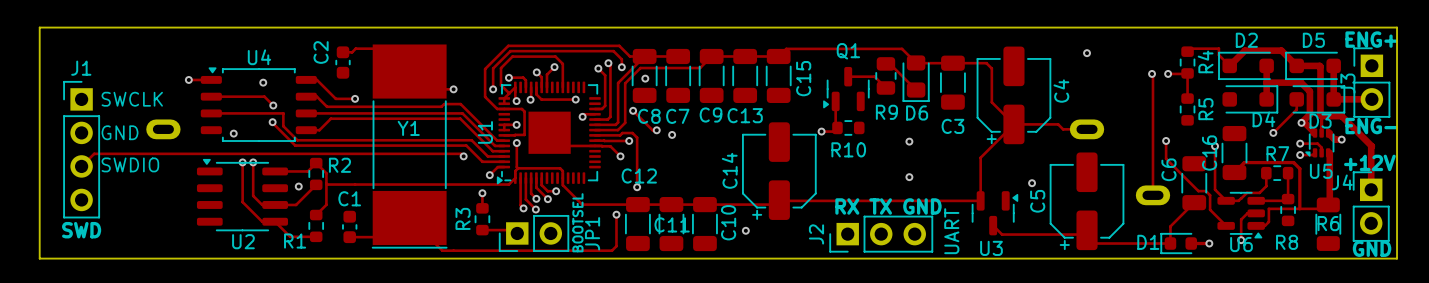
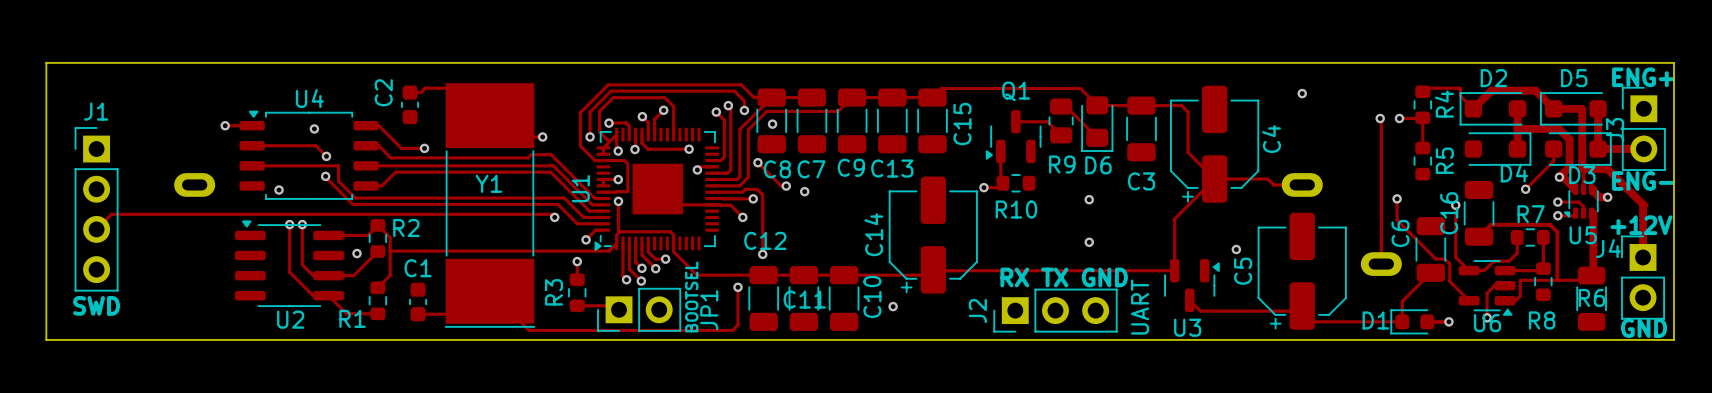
text: SWCLK (132, 99) -> none
text: GND (120, 132) -> none
text: SWDIO (130, 164) -> none

